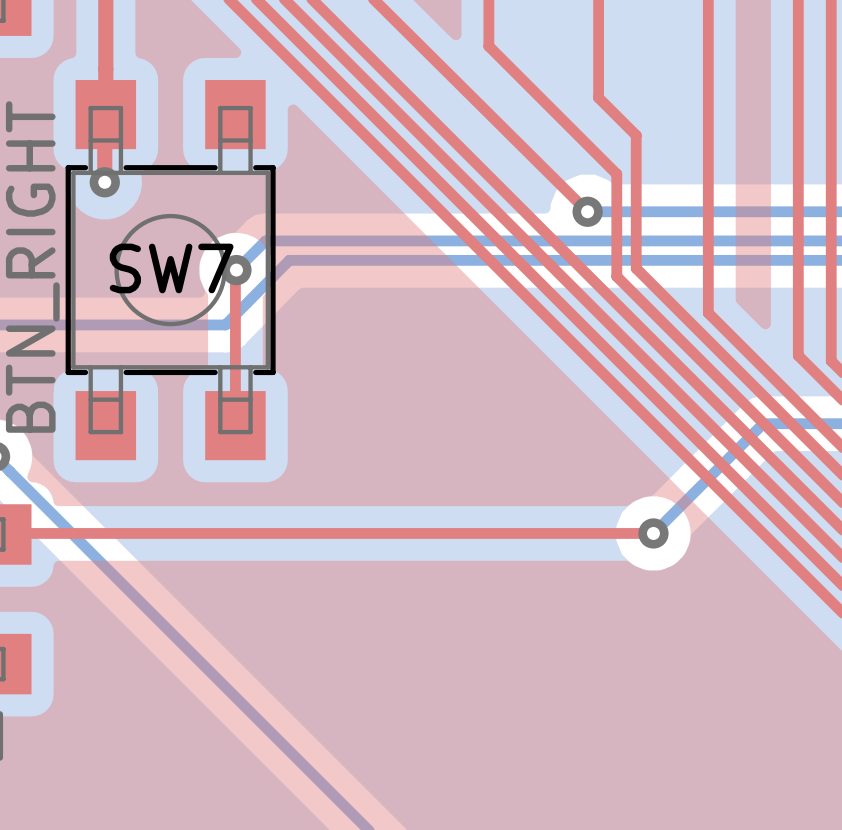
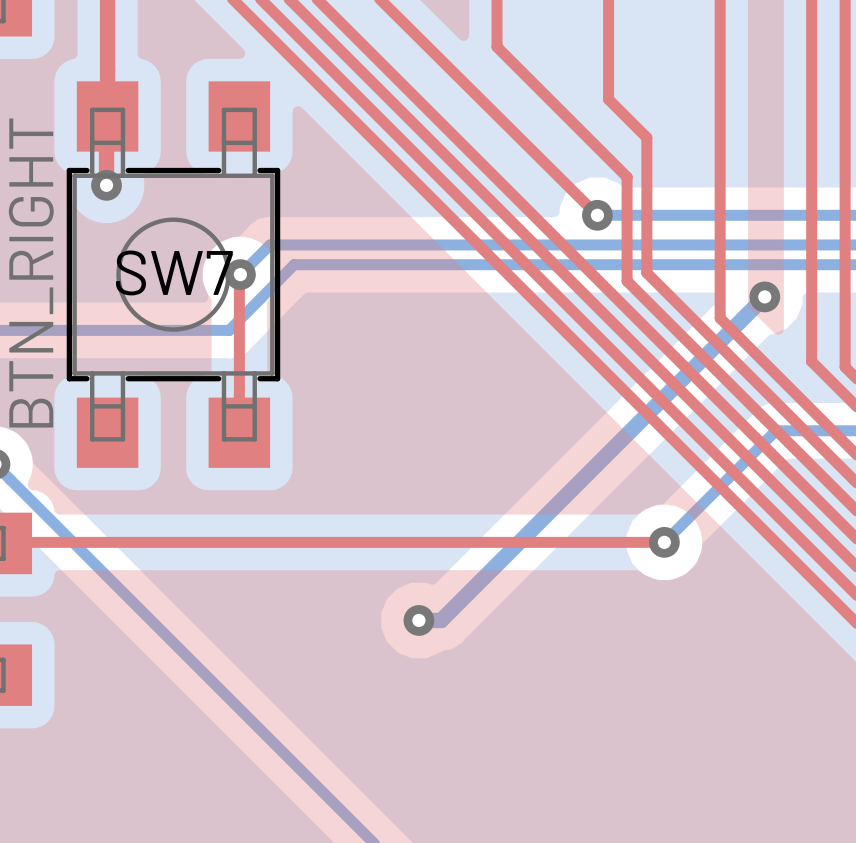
bottom track: none -> (764, 296) (441, 620) (418, 620)
via: none -> (764, 296)
via: none -> (418, 620)

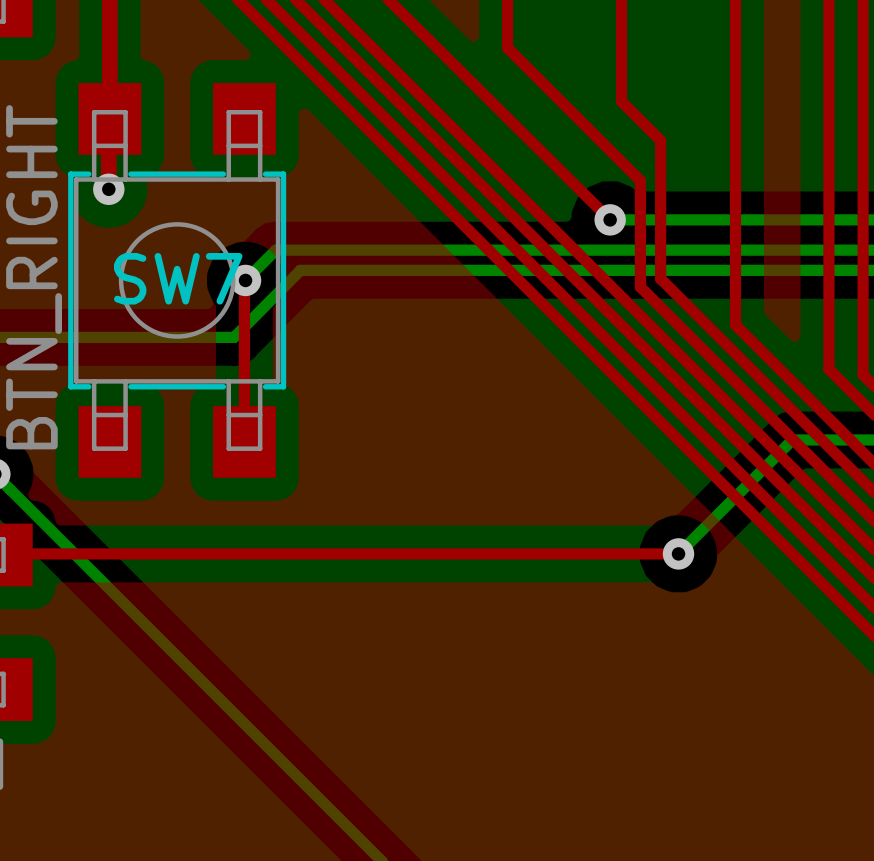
bottom track: (764, 296) (441, 620) (418, 620) -> none
via: (764, 296) -> none
via: (418, 620) -> none

